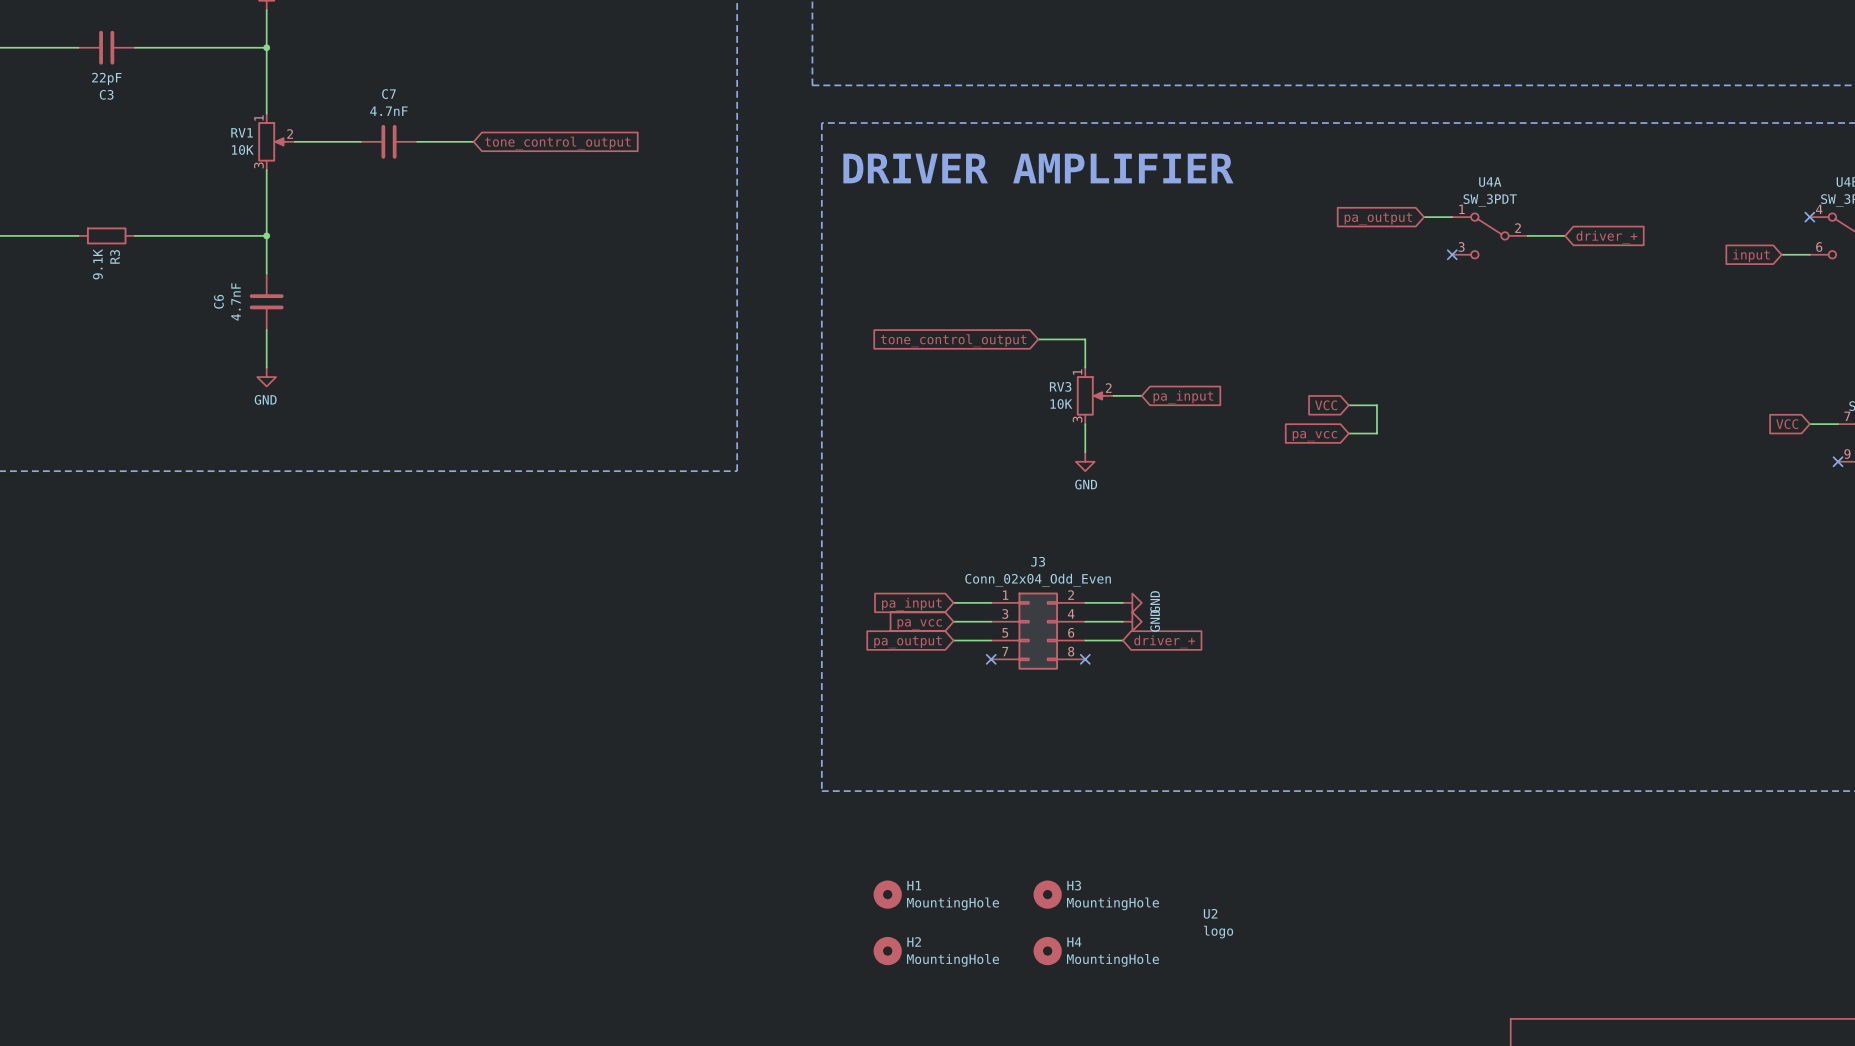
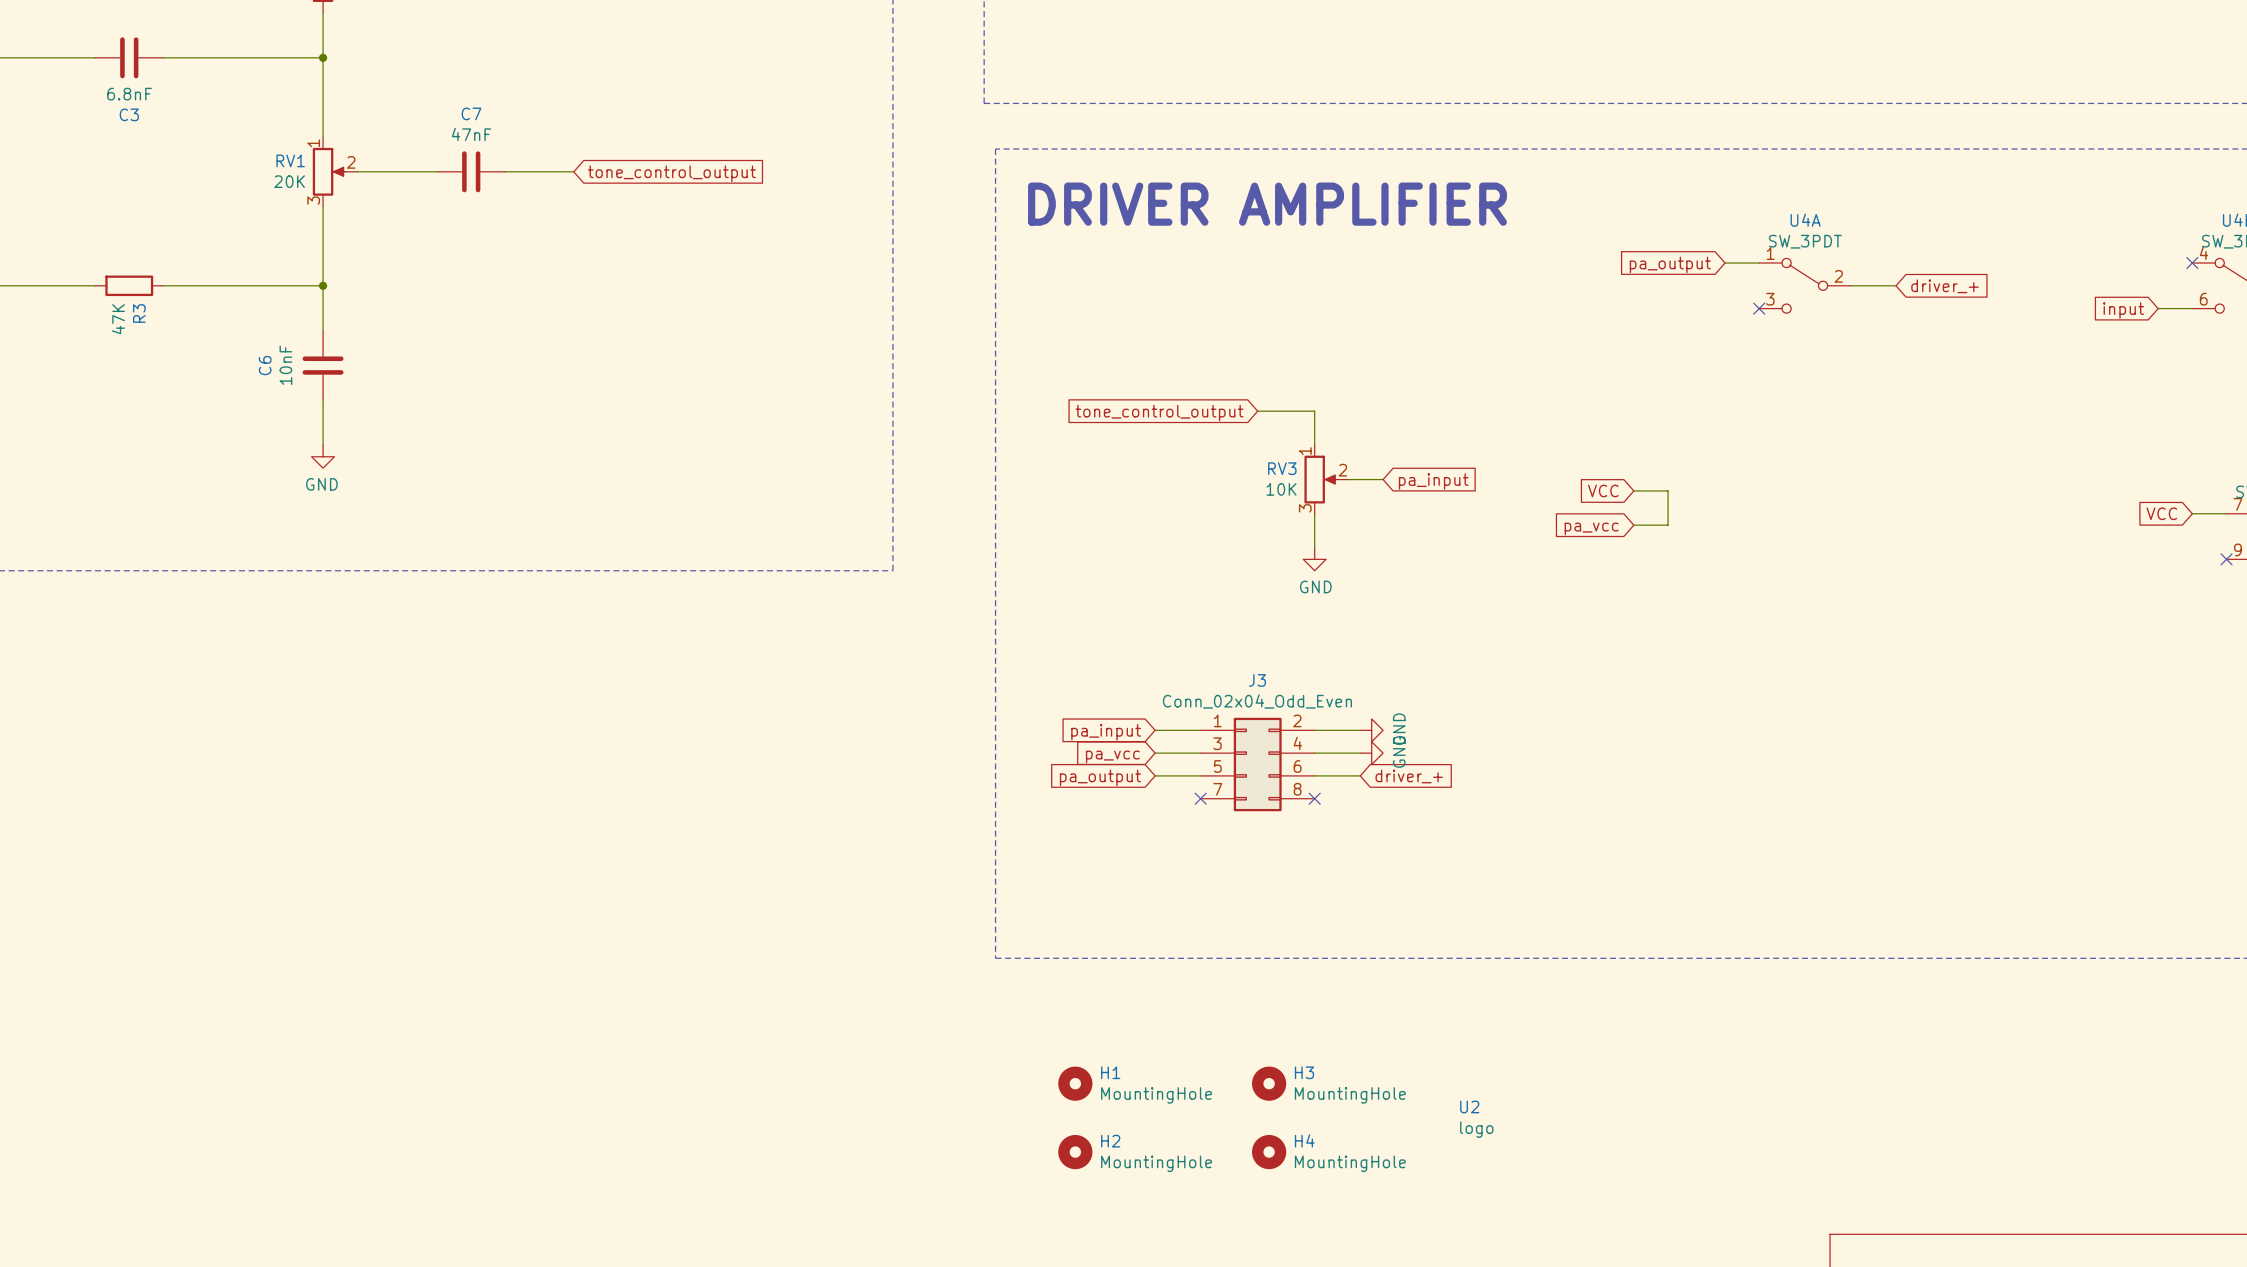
C3 value: 22pF (106, 78) -> 6.8nF (129, 94)
C7 value: 4.7nF (388, 111) -> 47nF (471, 134)
RV1 value: 10K (242, 149) -> 20K (289, 181)
R3 value: 9.1K (97, 264) -> 47K (118, 319)
C6 value: 4.7nF (236, 301) -> 10nF (285, 365)

